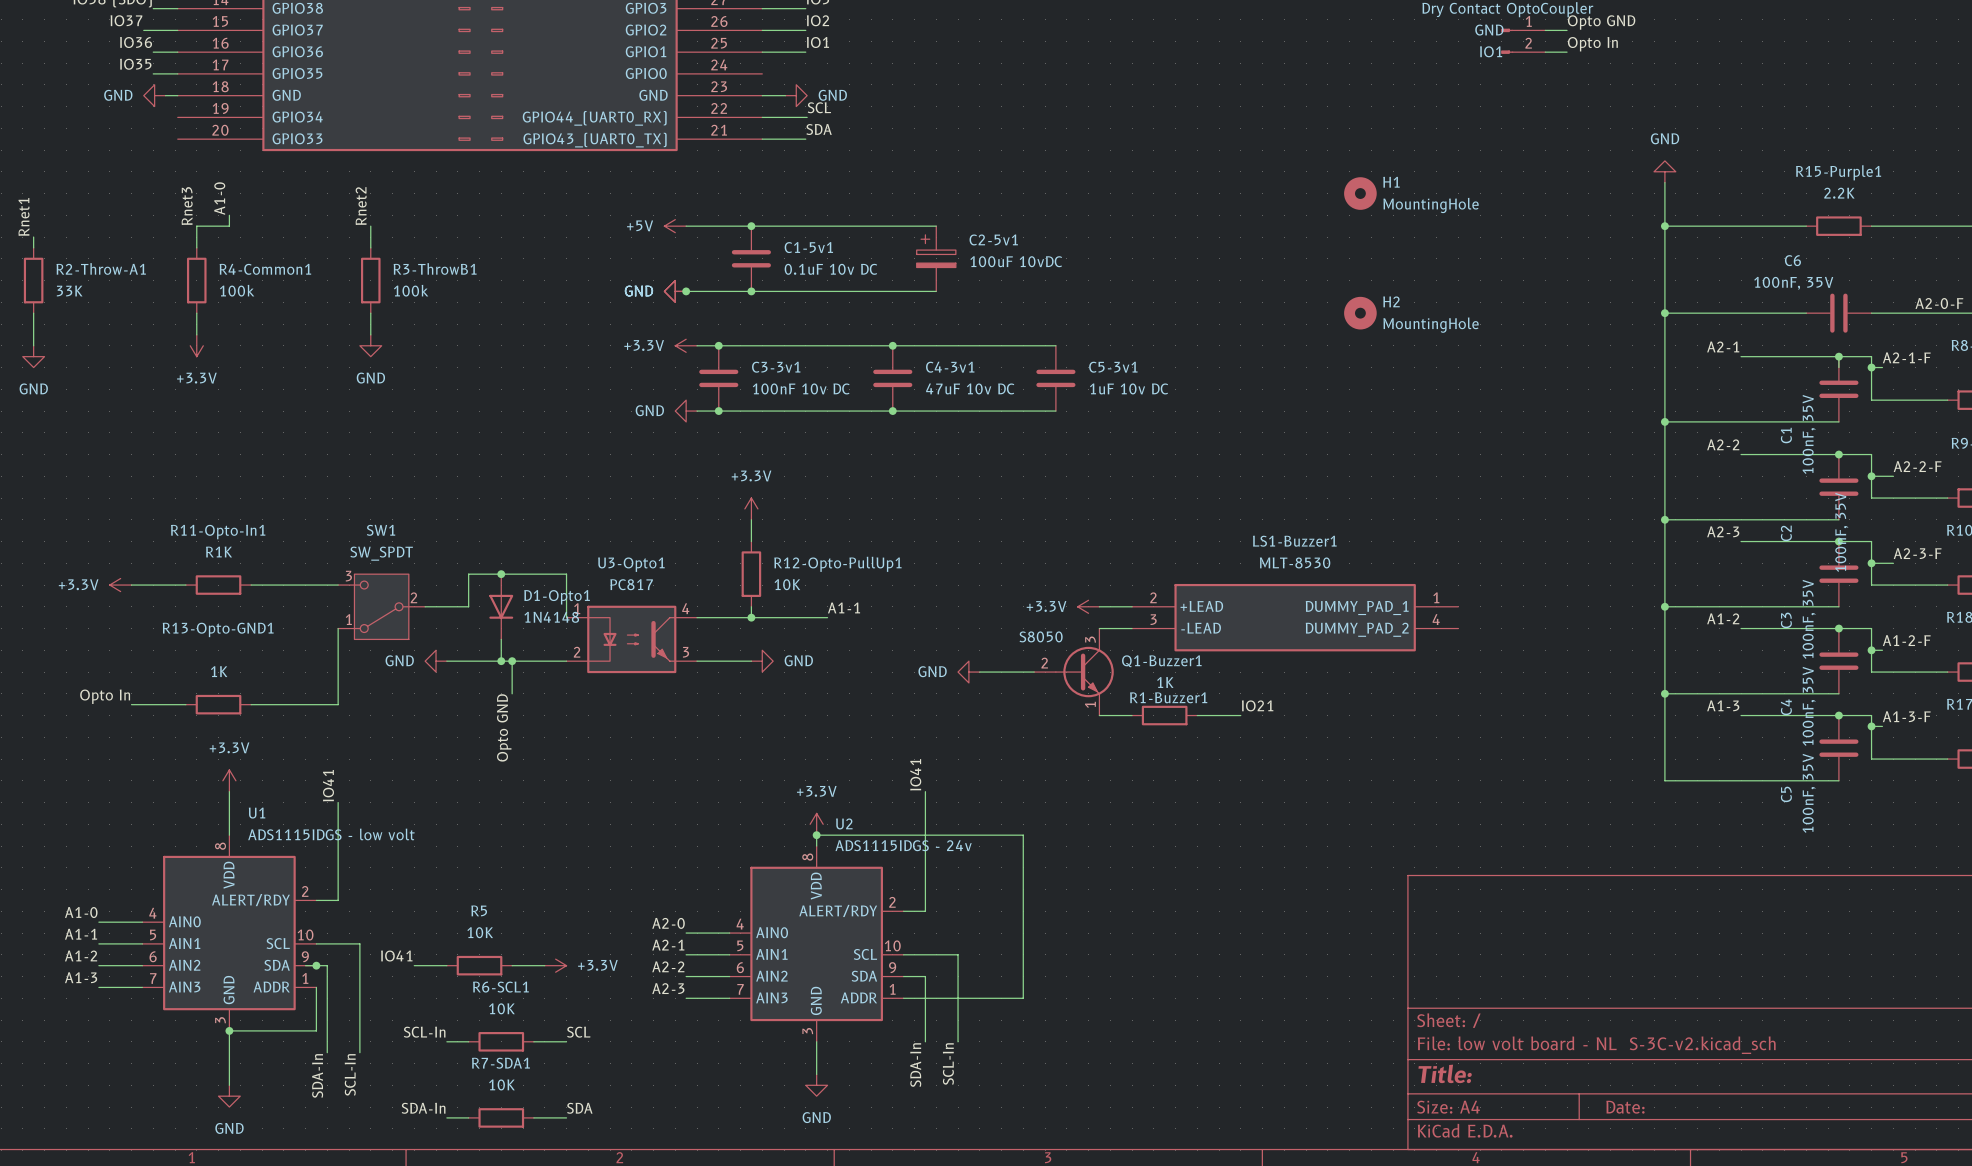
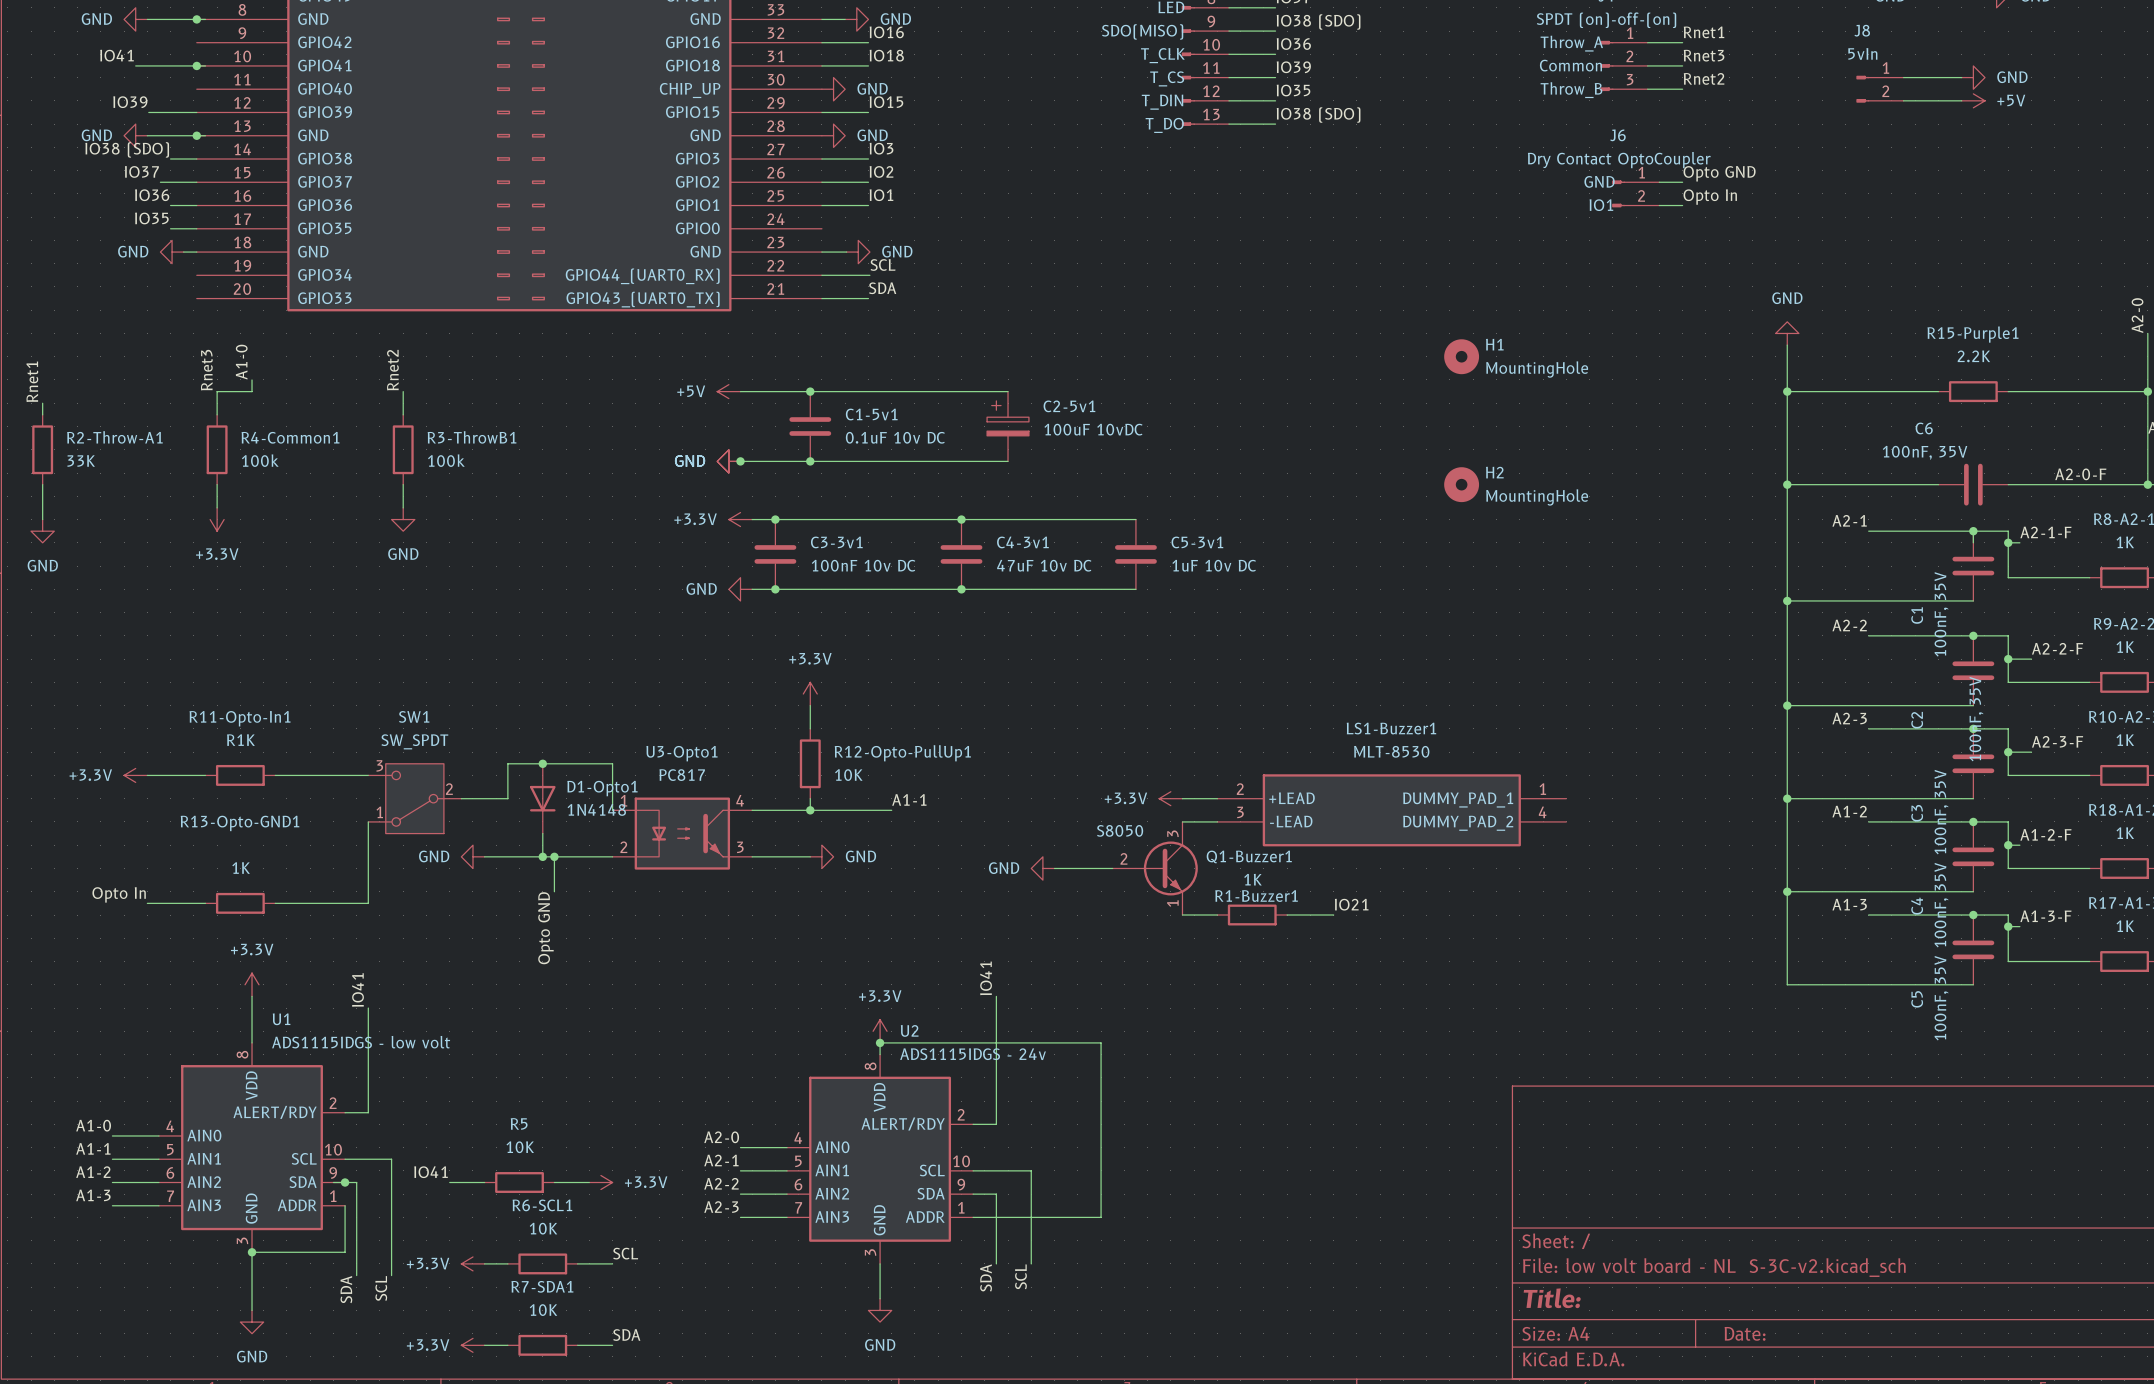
label: SCL-In (424, 1032) -> none
power symbol: none -> +3.3V (472, 1263)
label: SCL-In (948, 1064) -> SCL (1020, 1276)
label: SDA-In (915, 1065) -> SDA (986, 1278)
label: SCL-In (350, 1074) -> SCL (381, 1288)
label: SDA-In (317, 1075) -> SDA (346, 1289)
label: SDA-In (423, 1108) -> none
power symbol: none -> +3.3V (472, 1345)

